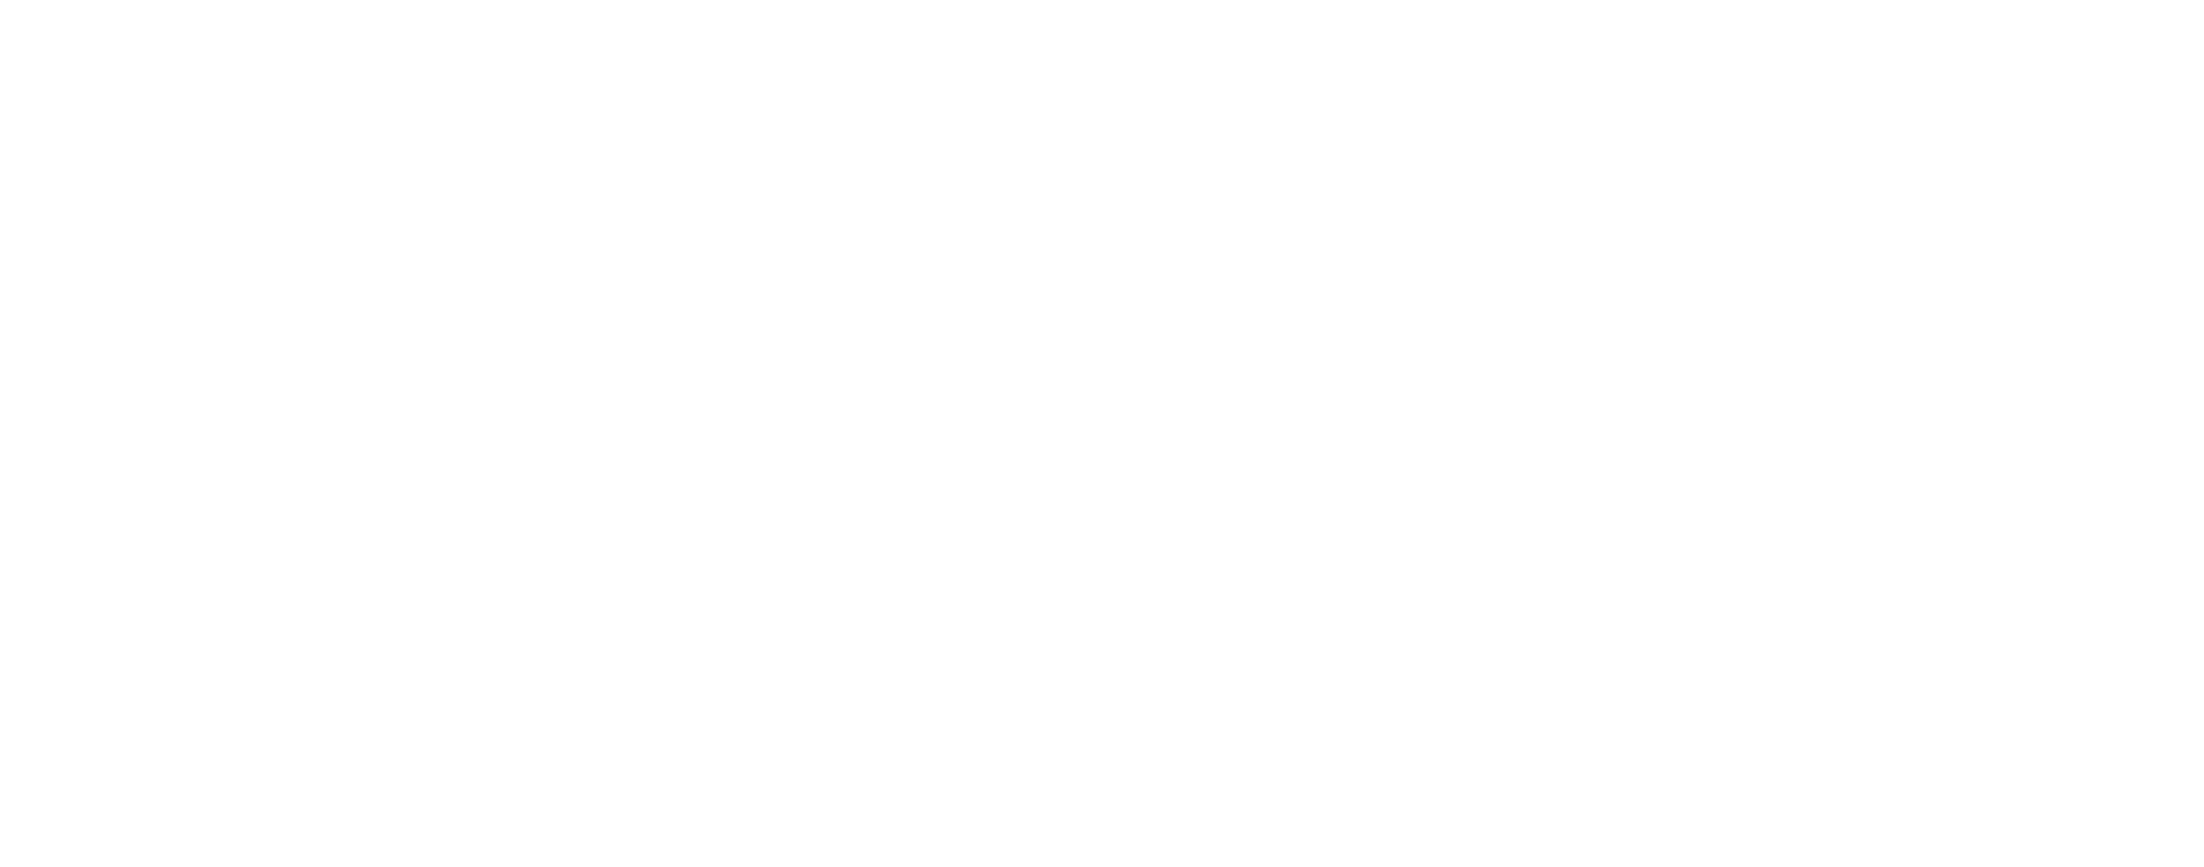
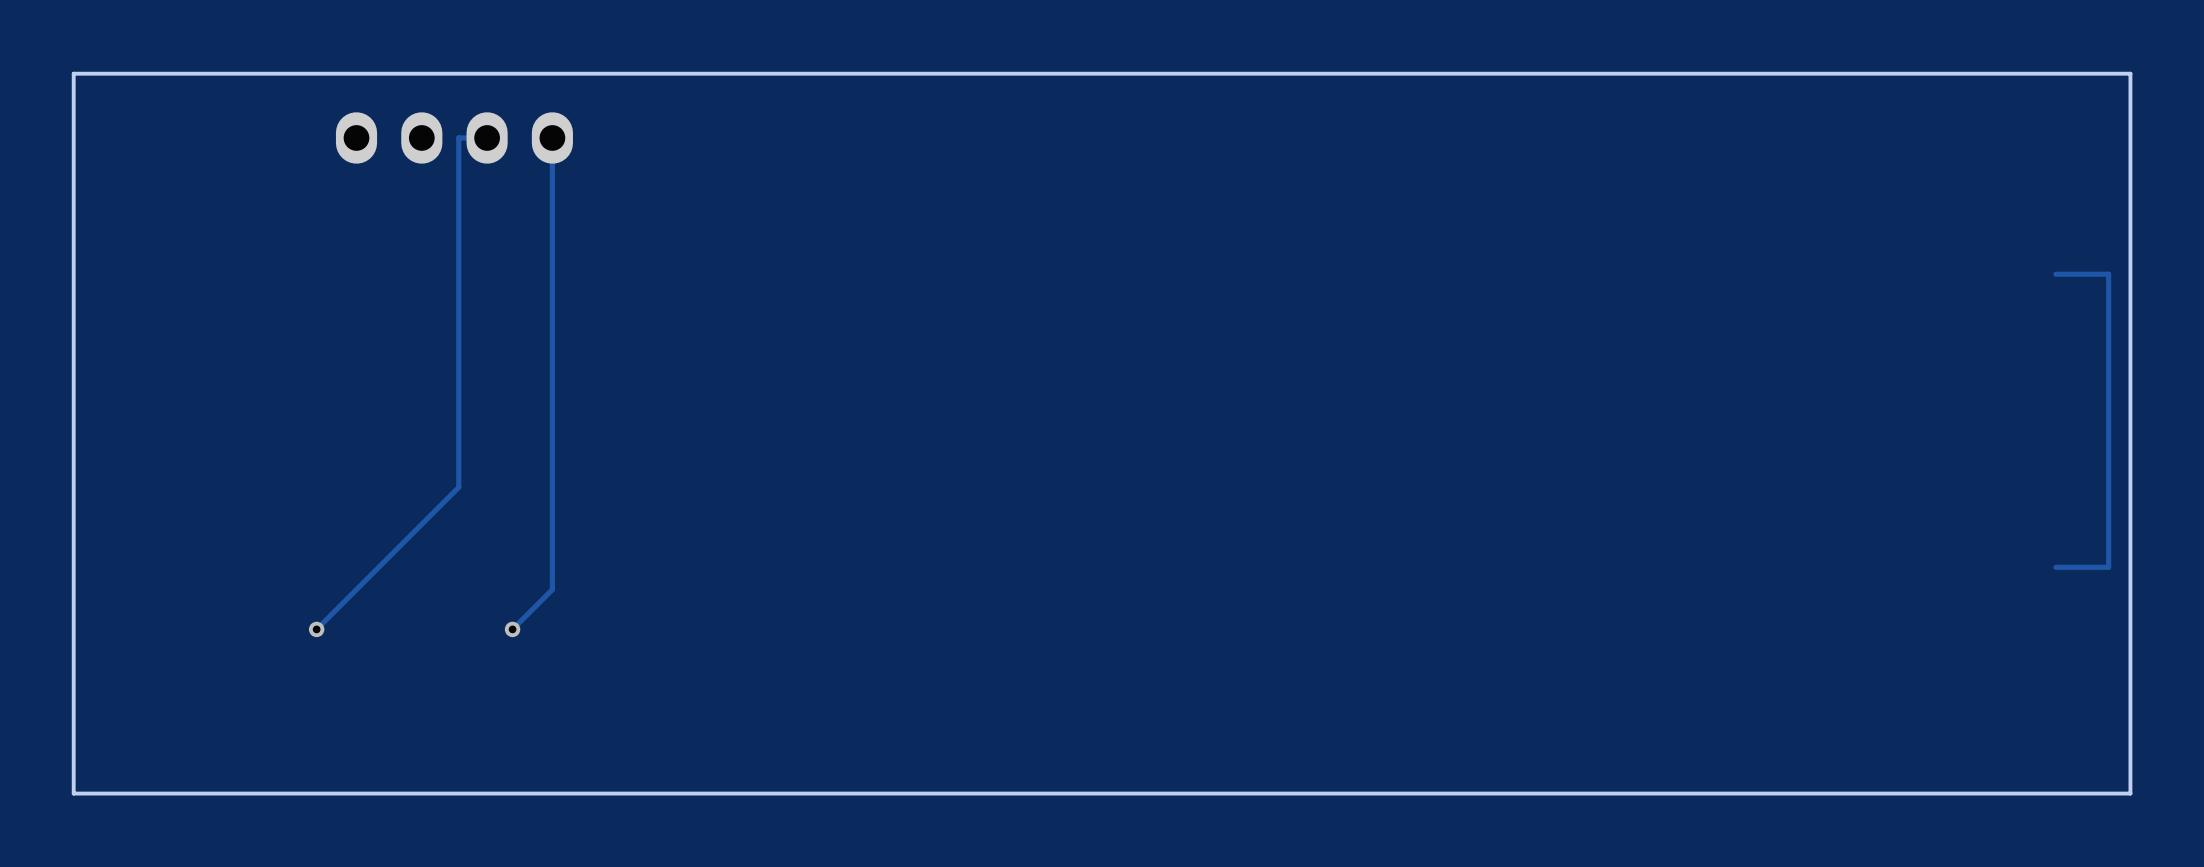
board edge: none -> (2130, 73) (73, 73) (73, 793) (2130, 793) (2130, 73)
part: none -> (454, 137)
track: none -> (487, 137) (458, 137) (458, 487) (316, 629)
track: none -> (552, 137) (552, 589) (512, 629)
track: none -> (2055, 274) (2108, 274) (2108, 567) (2055, 567)
via: none -> (316, 629)
via: none -> (512, 629)

